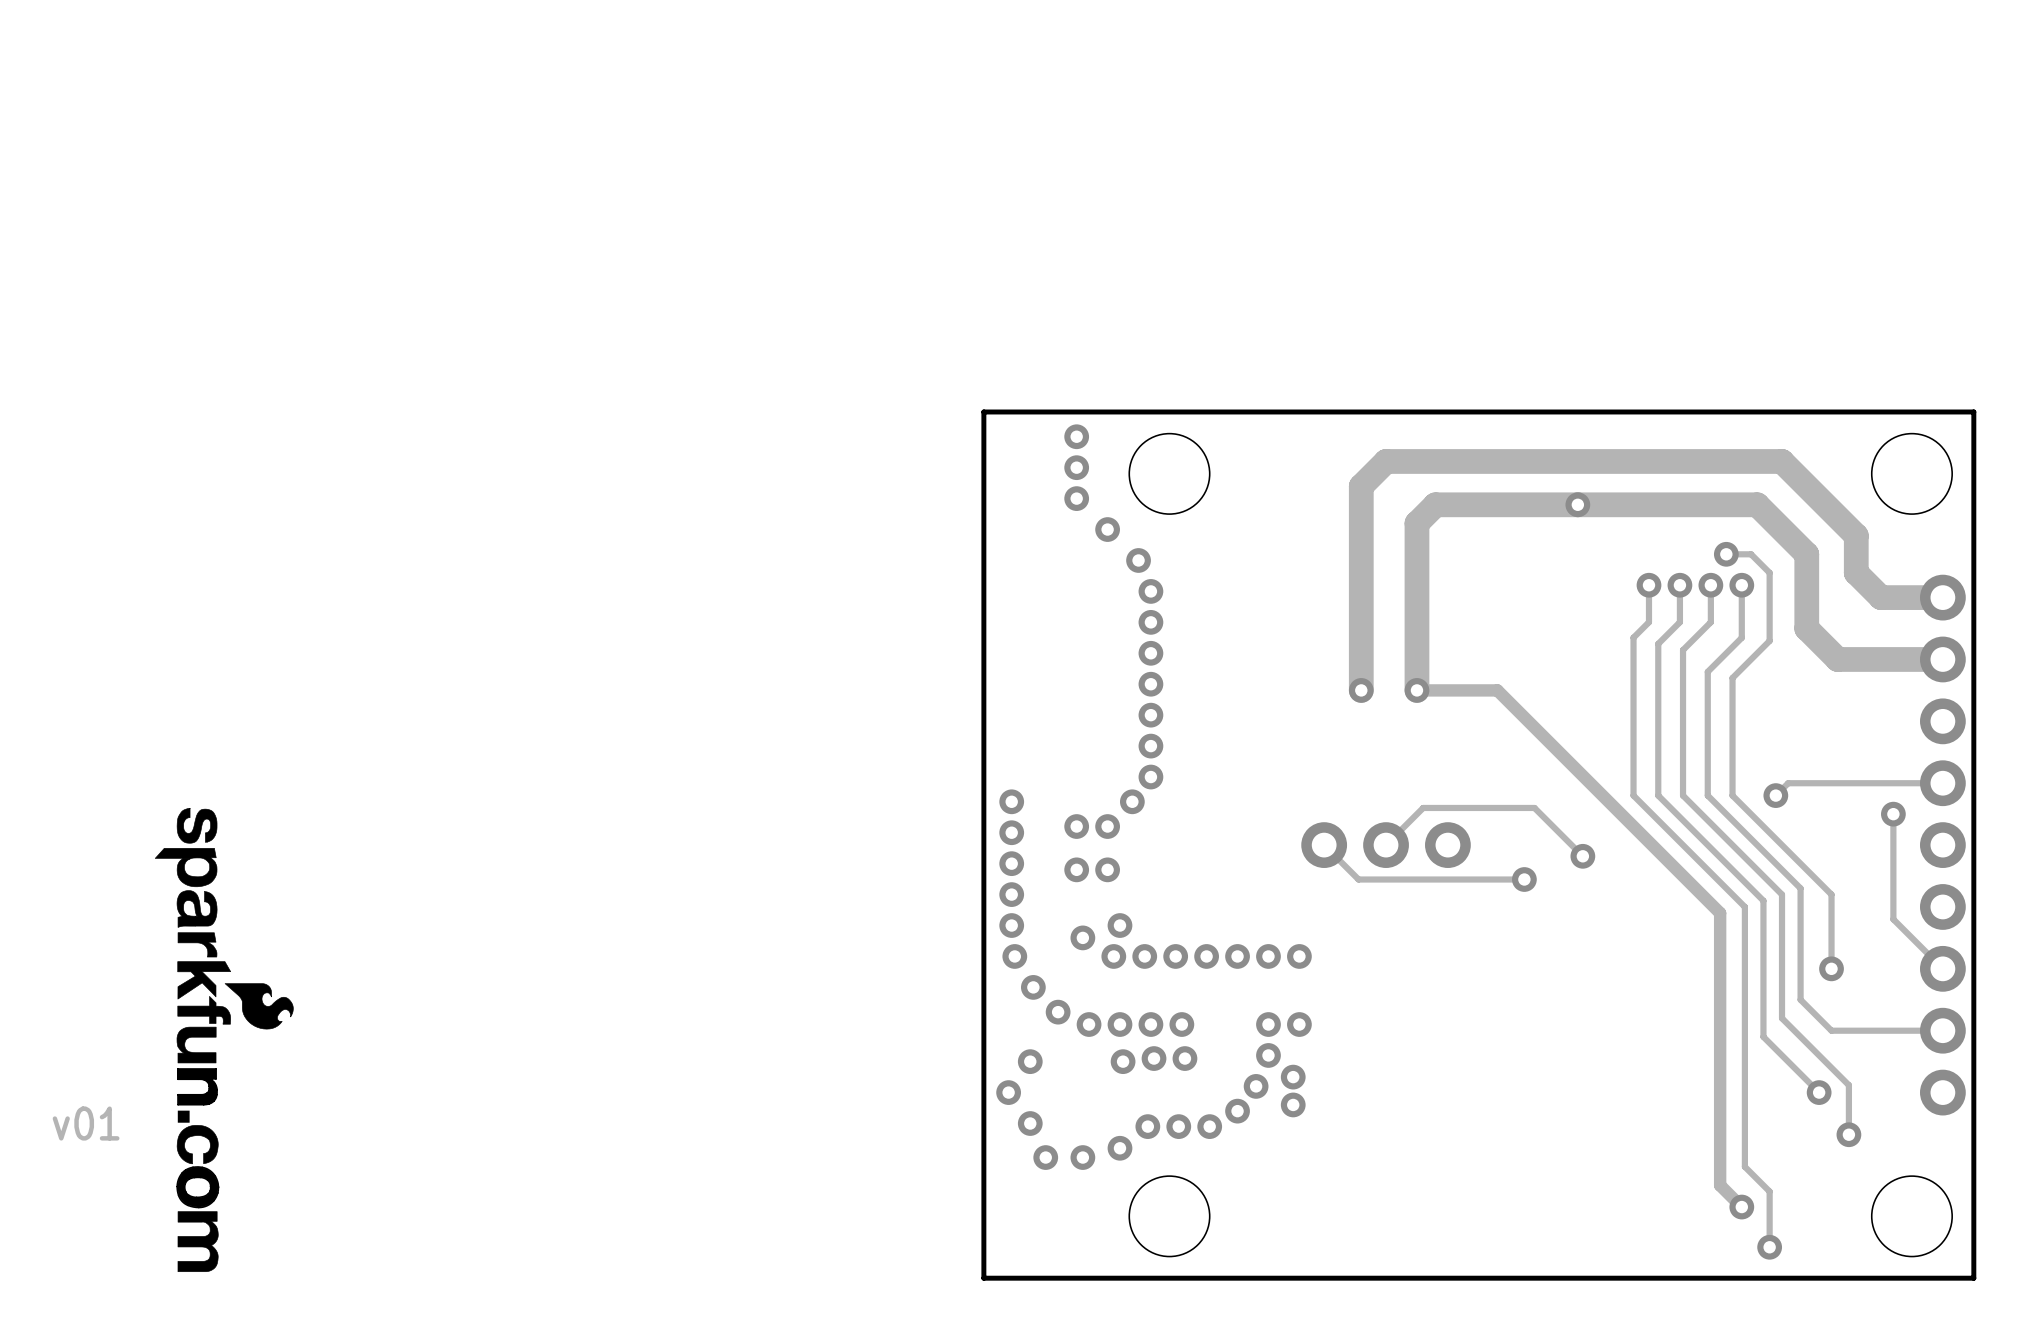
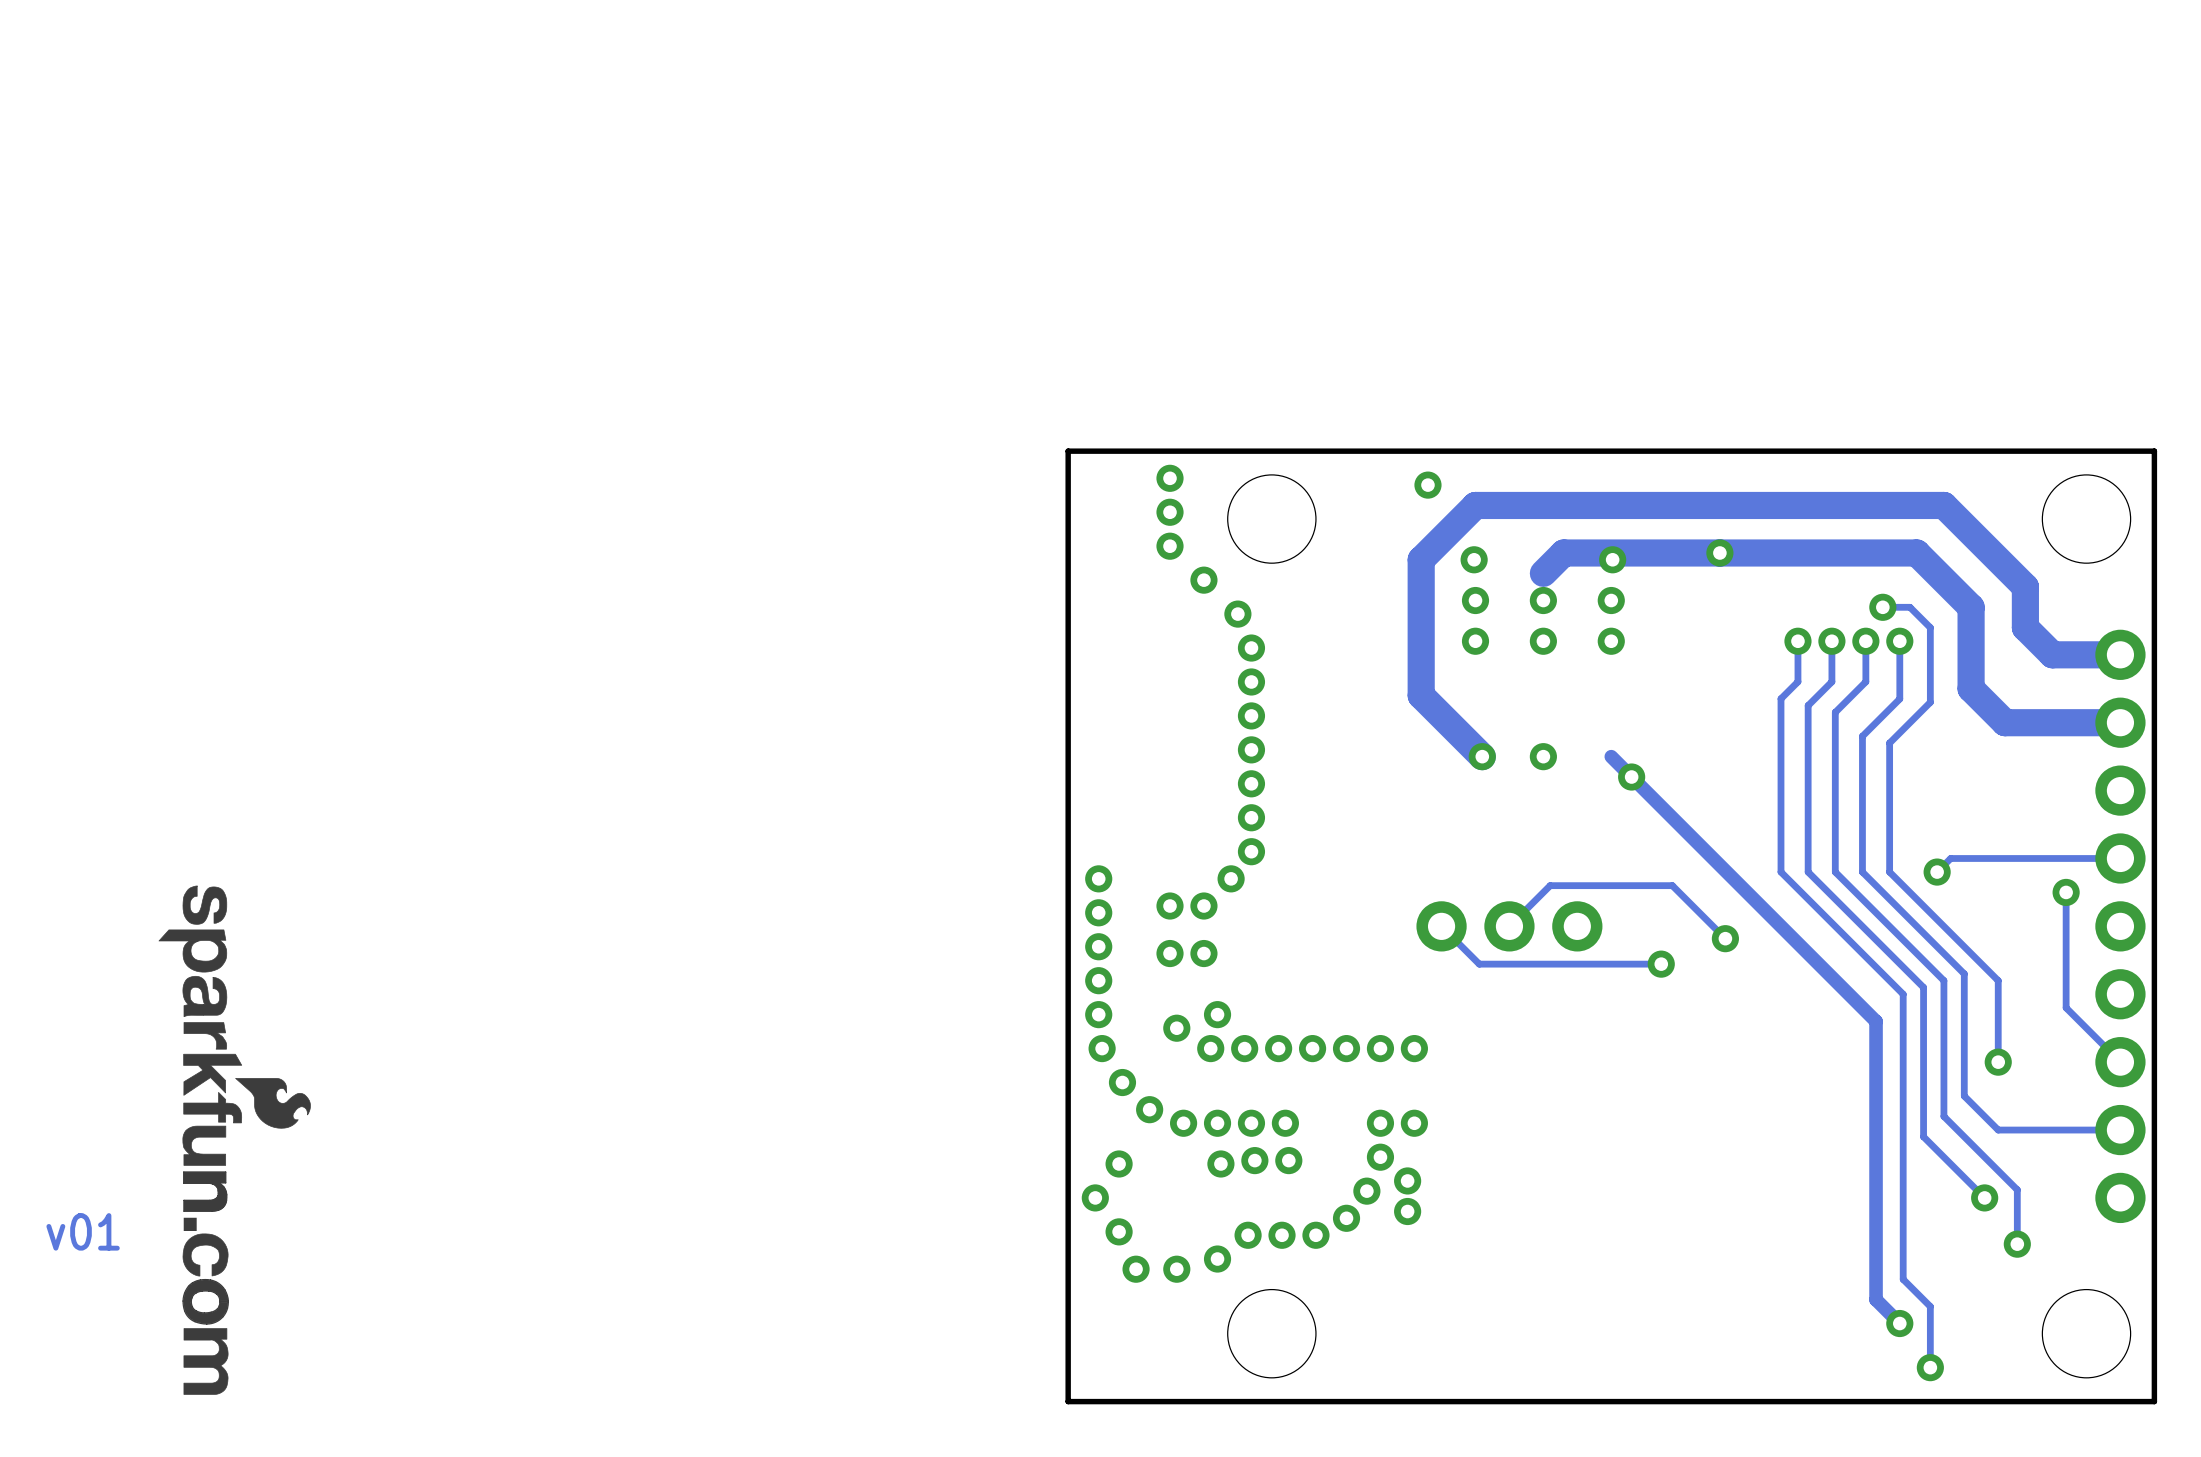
via: none -> (1427, 485)
track: (1386, 461) (1361, 486) (1361, 690) -> (1509, 505) (1475, 505) (1421, 559) (1421, 695) (1482, 756)
via: none -> (1474, 559)
via: none -> (1612, 559)
track: (1416, 523) (1416, 690) (1497, 690) (1720, 913) (1720, 931) -> (1611, 756) (1876, 1021)
via: none -> (1475, 600)
via: none -> (1543, 600)
via: none -> (1611, 600)
via: none -> (1475, 641)
via: none -> (1543, 641)
via: none -> (1611, 641)
via: none -> (1631, 777)

